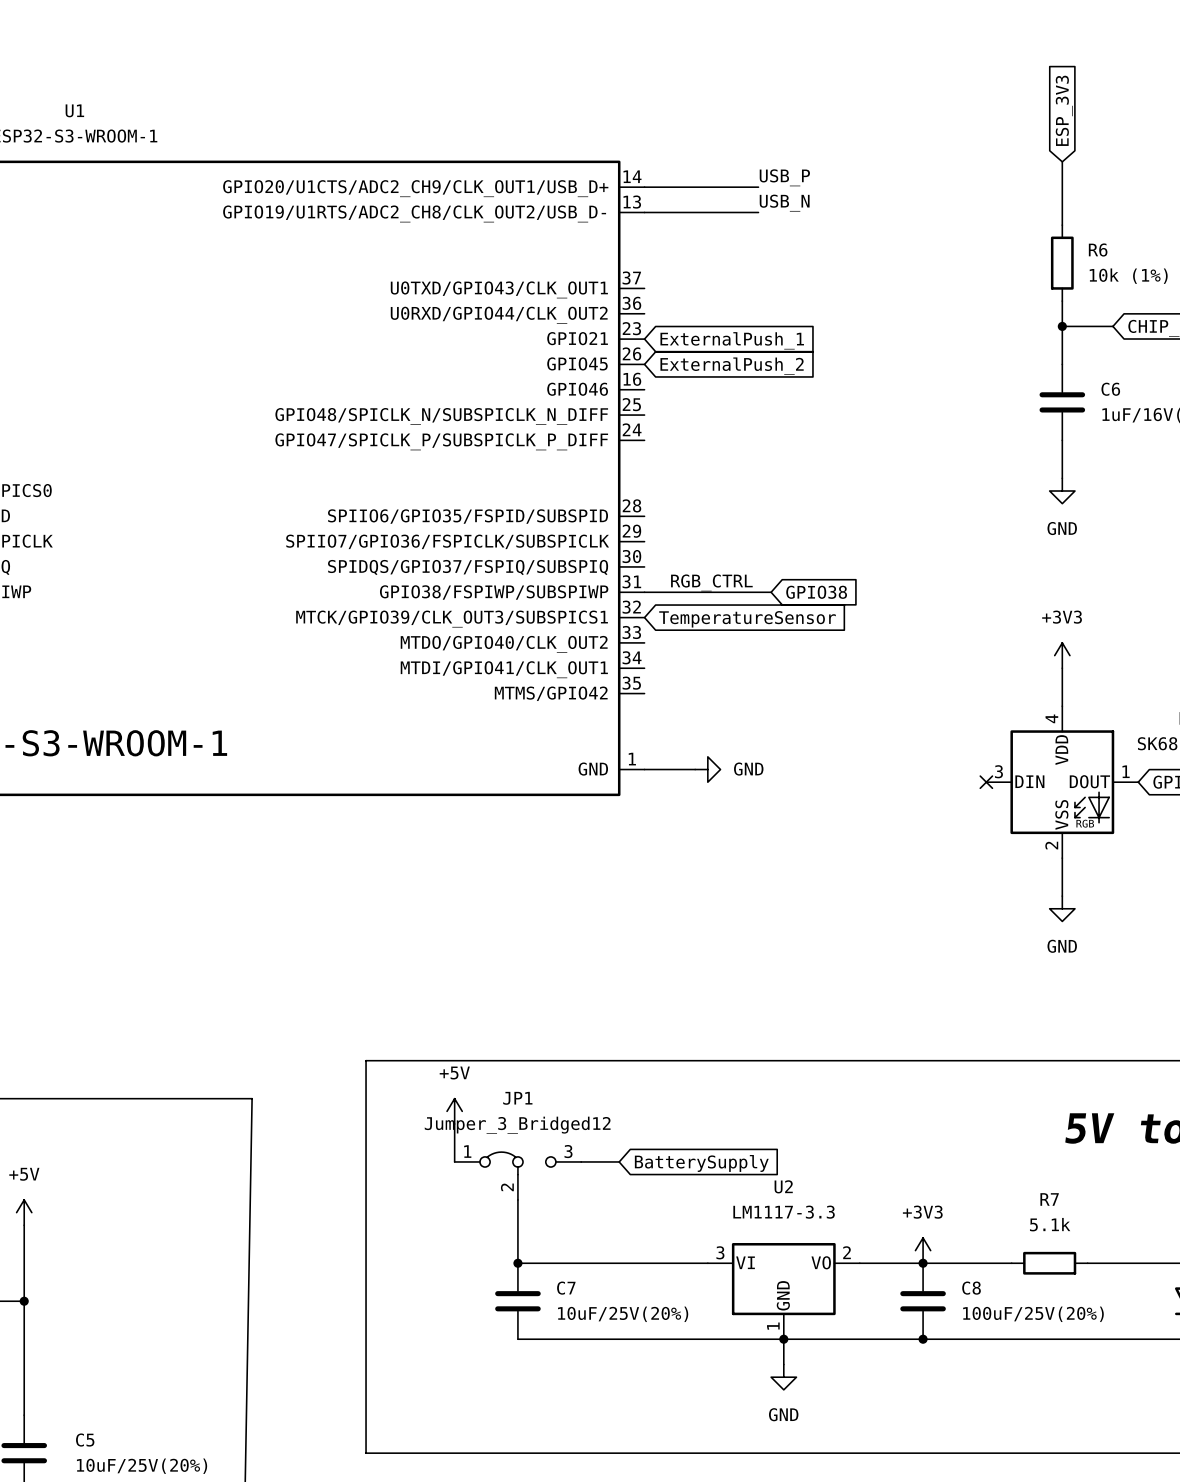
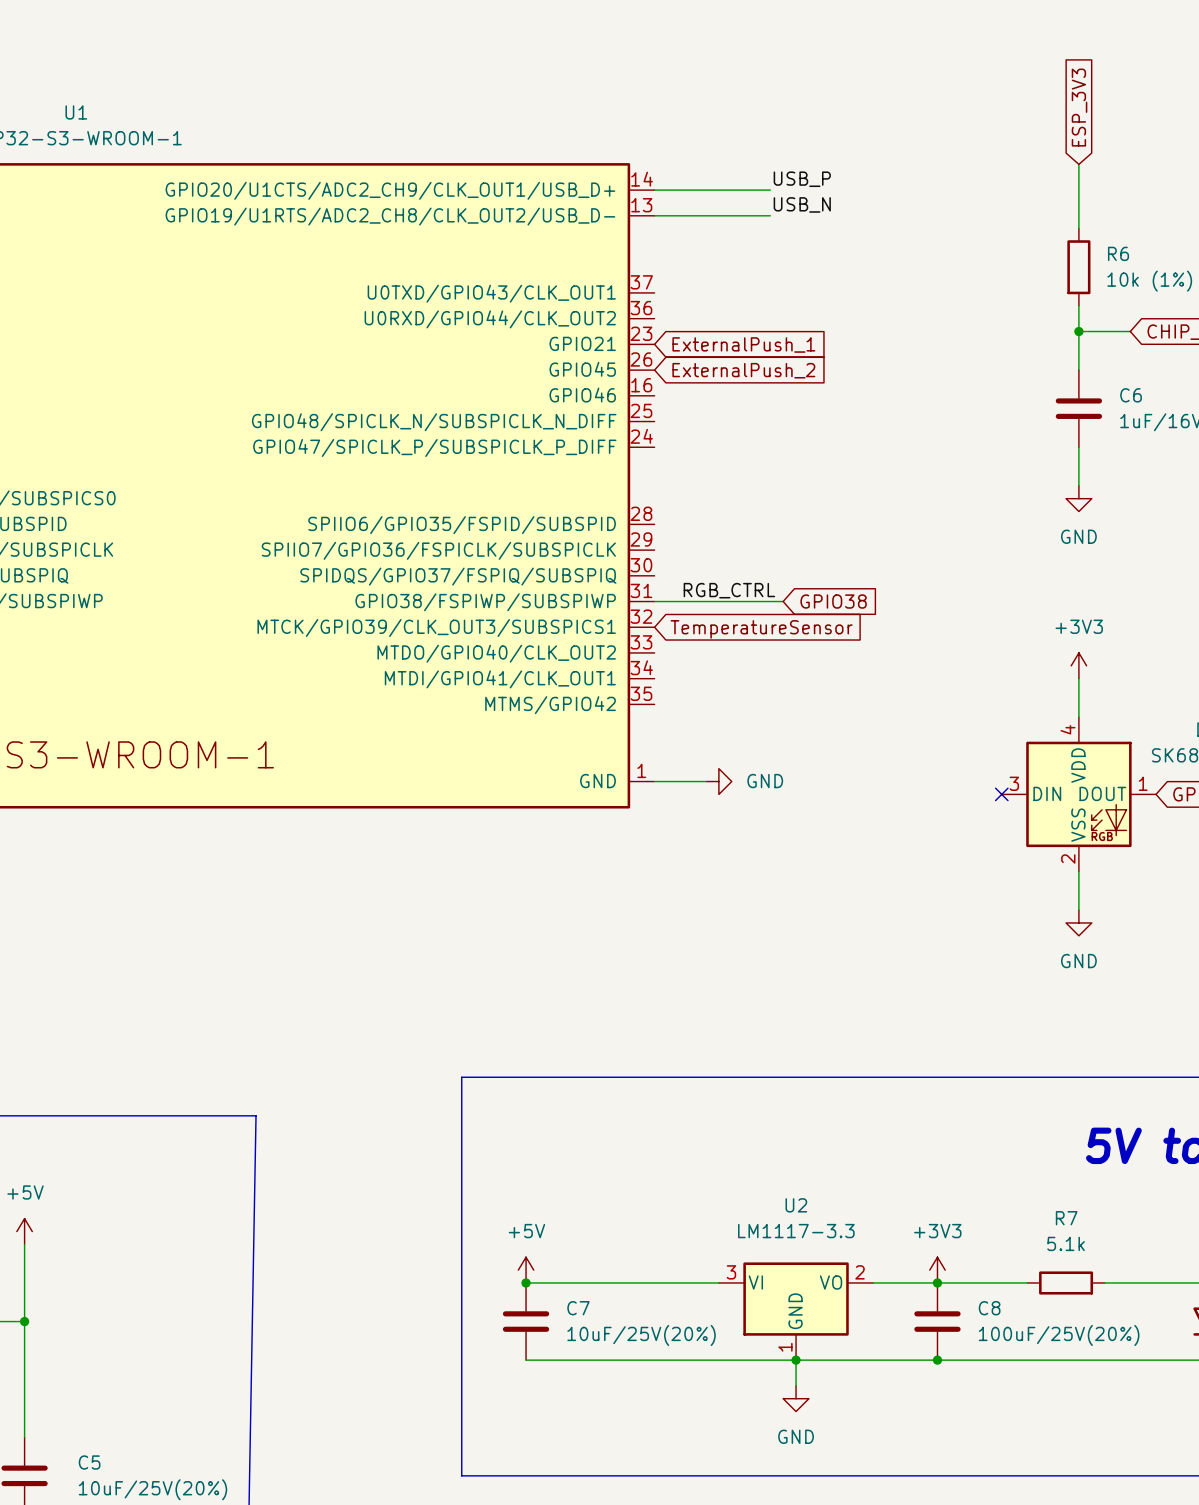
line: (454, 1060) (366, 1060) (366, 1453) (454, 1453) -> (461, 1077) (461, 1475)
power symbol position: +5V (454, 1111) -> +5V (526, 1270)
wire: (581, 1161) (619, 1161) -> none
global label: BatterySupply (701, 1163) -> none
JP1: Jumper_3_Bridged12 (517, 1176) -> none
wire: (517, 1199) (517, 1263) -> none

